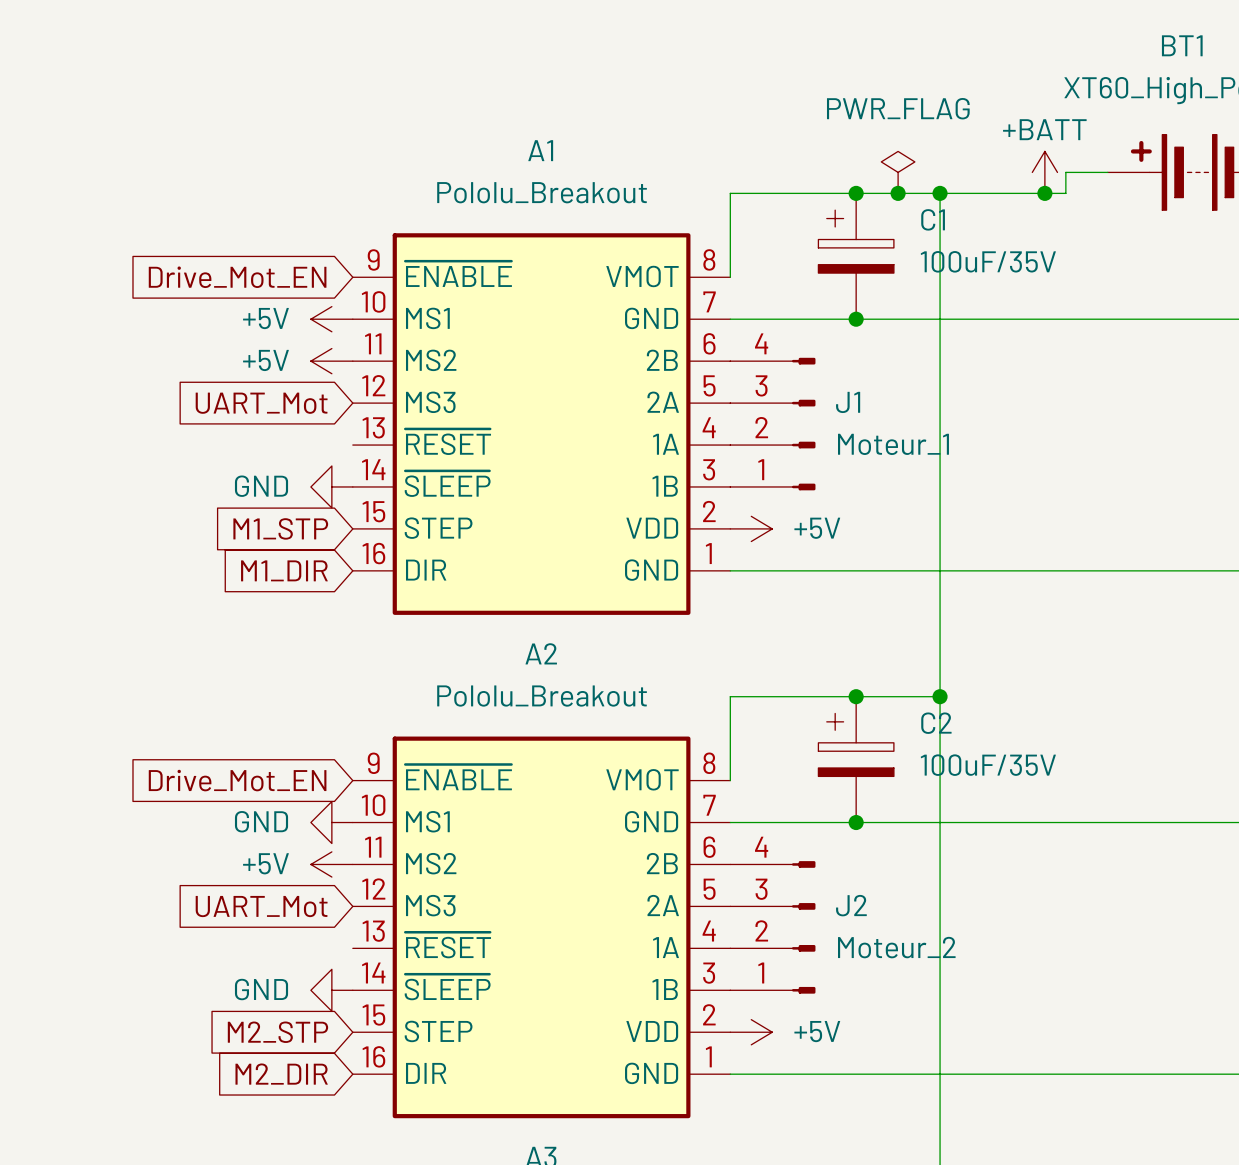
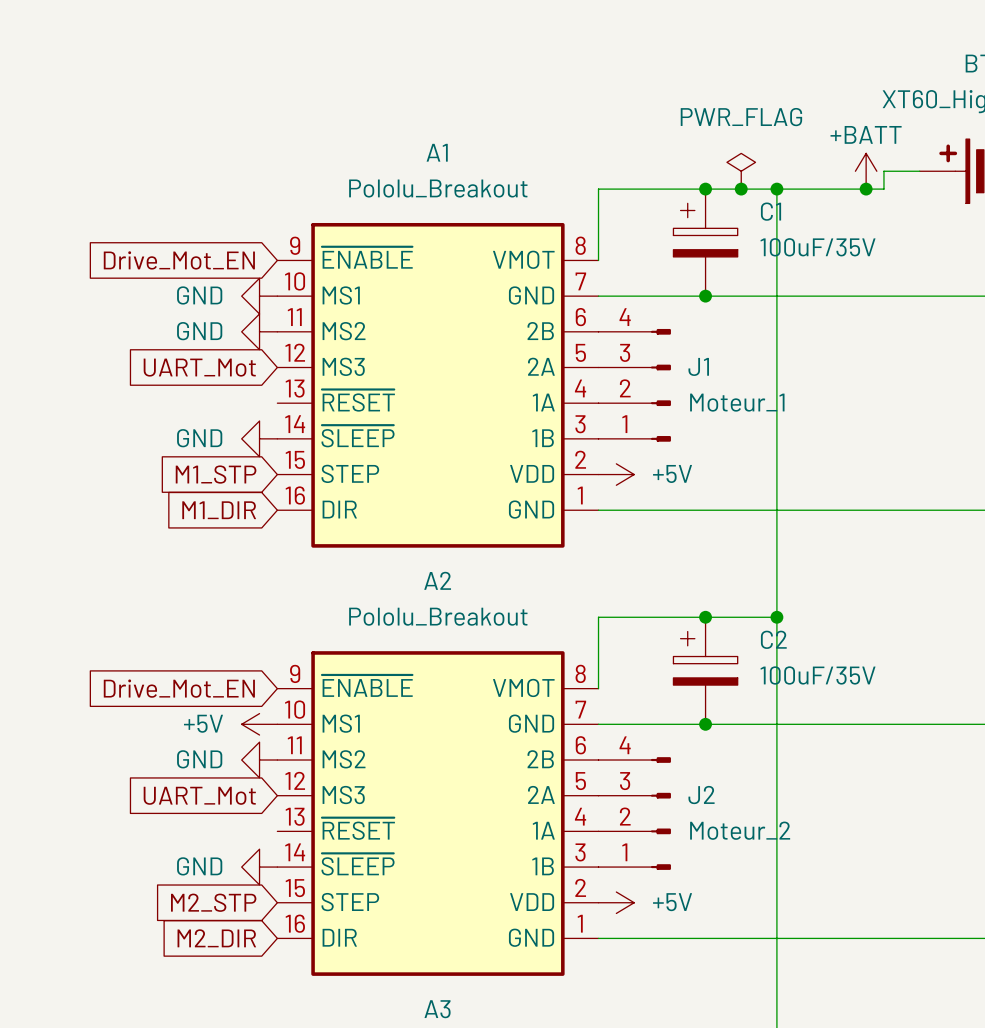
power symbol: +5V (331, 319) -> GND (259, 296)
power symbol: +5V (331, 361) -> GND (259, 331)
power symbol: GND (331, 822) -> +5V (259, 724)
power symbol: +5V (331, 864) -> GND (259, 760)

